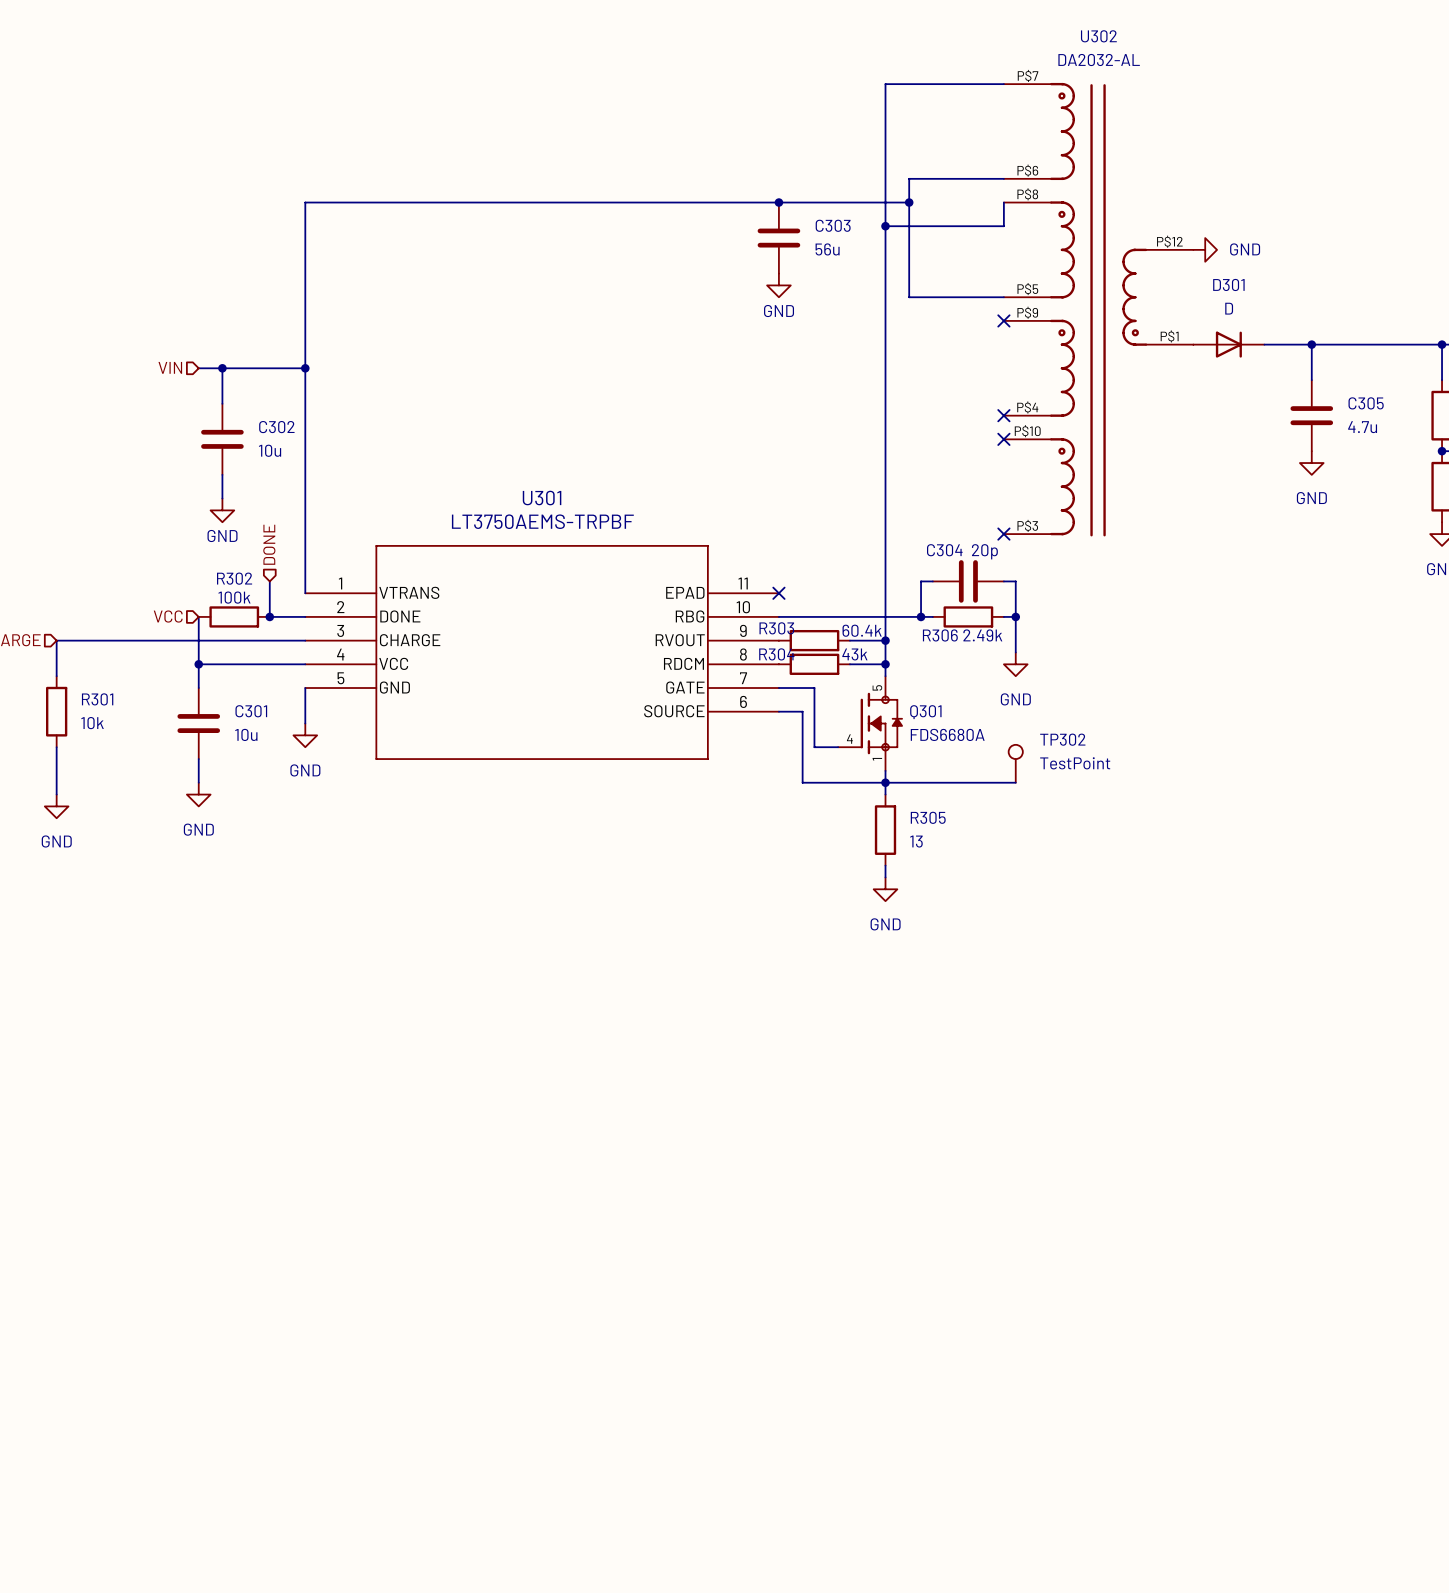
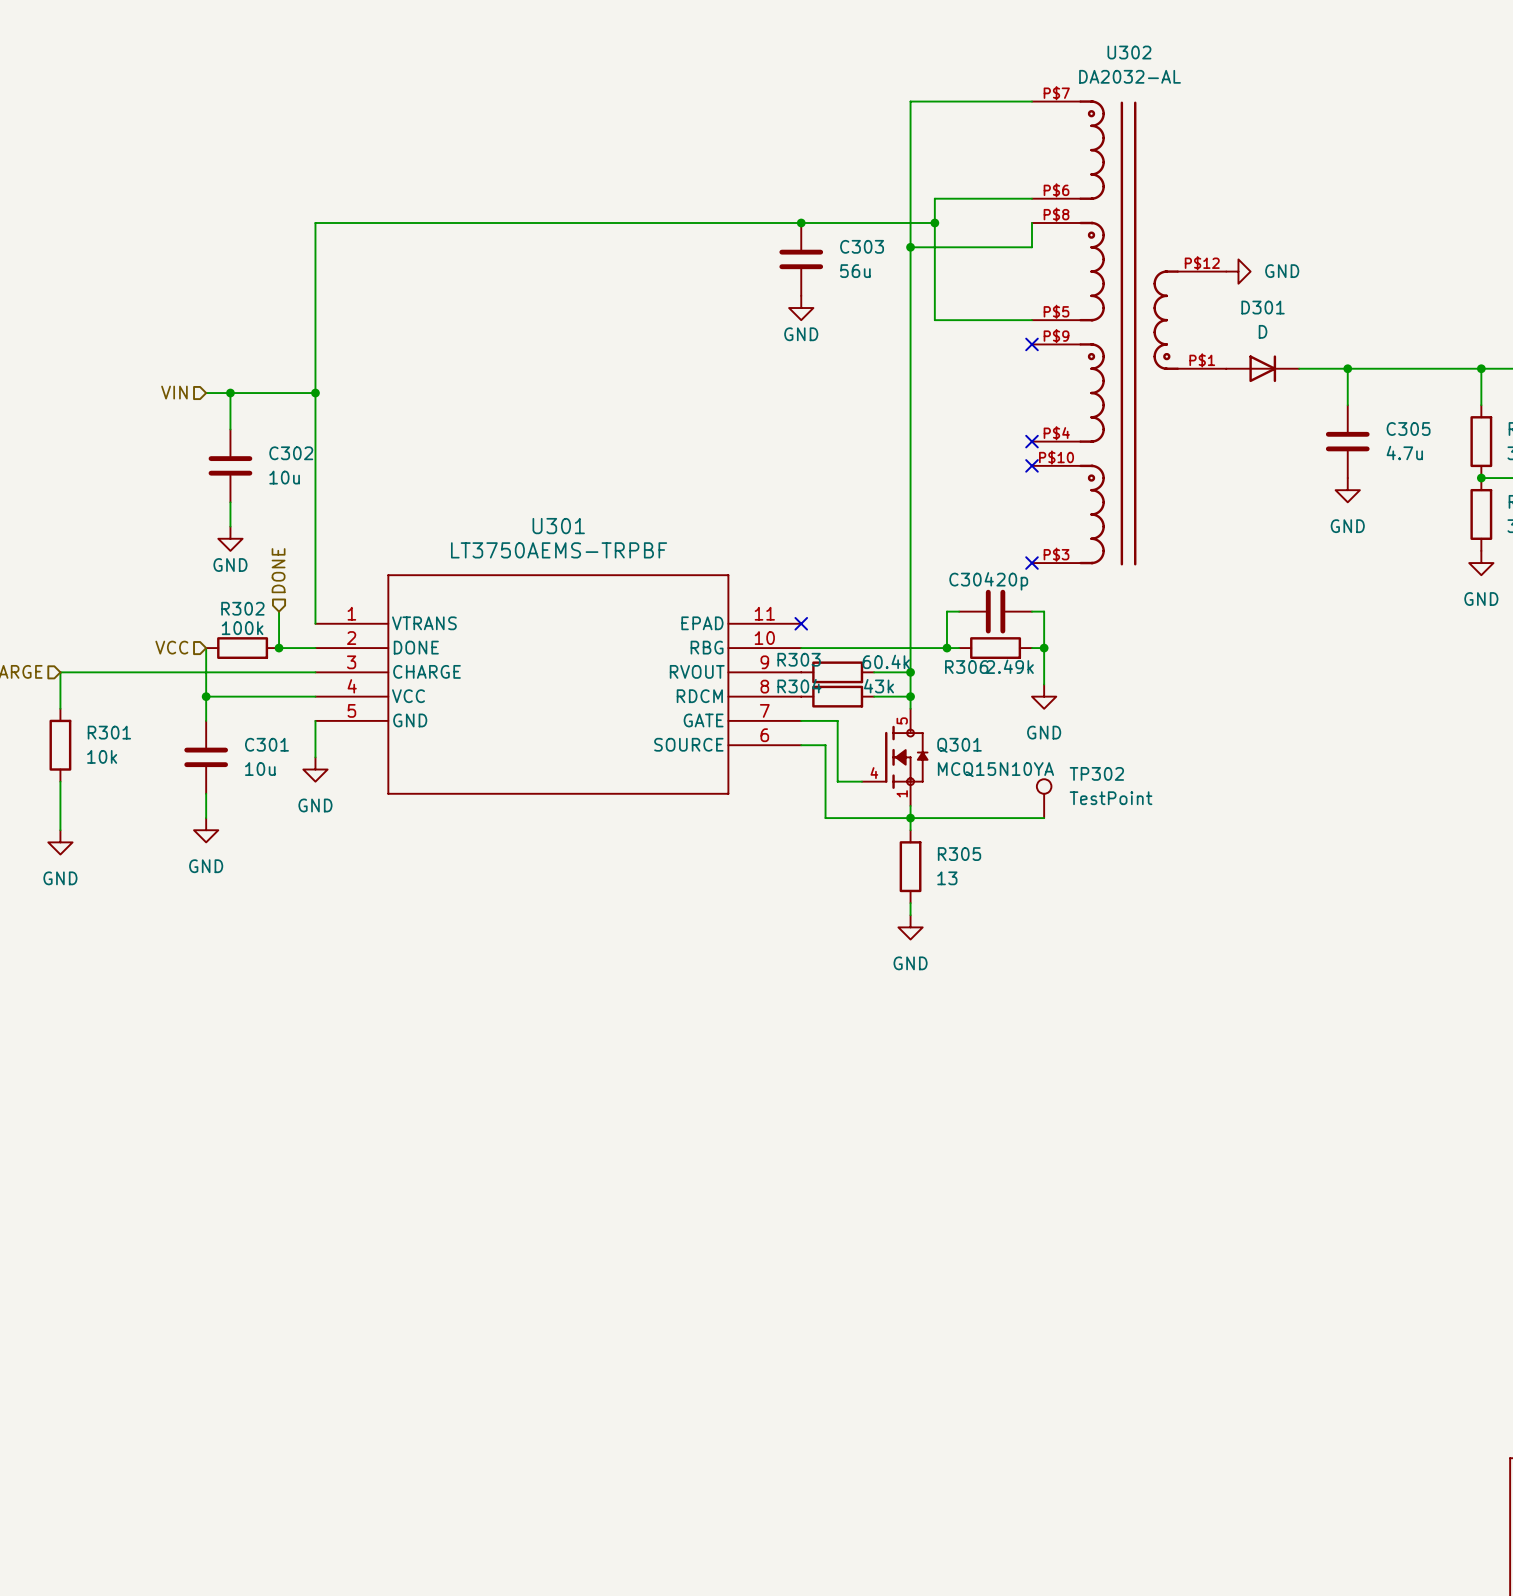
Q301 value: FDS6680A (947, 734) -> MCQ15N10YA (995, 769)

